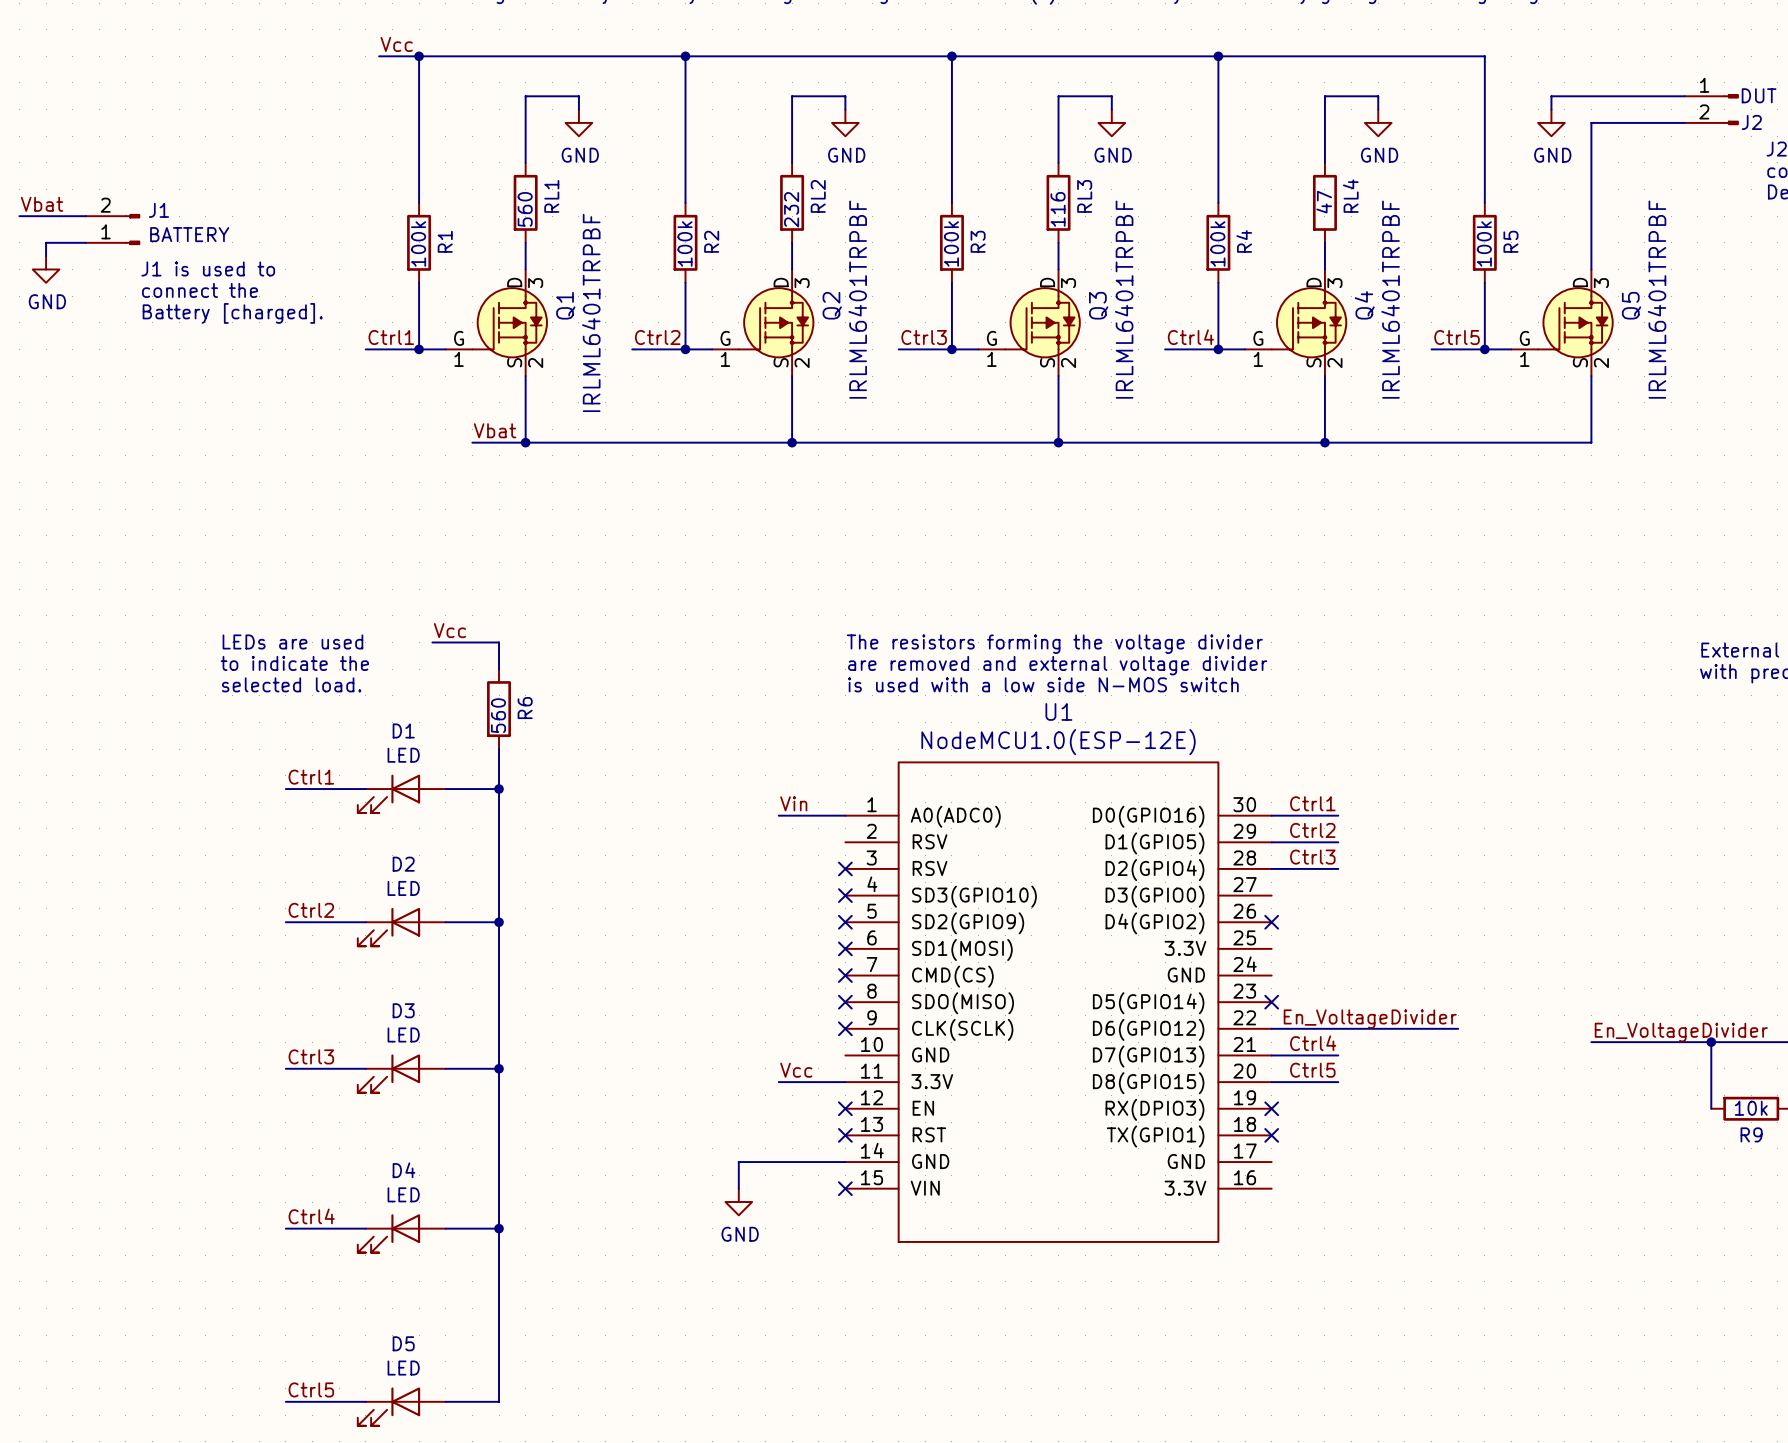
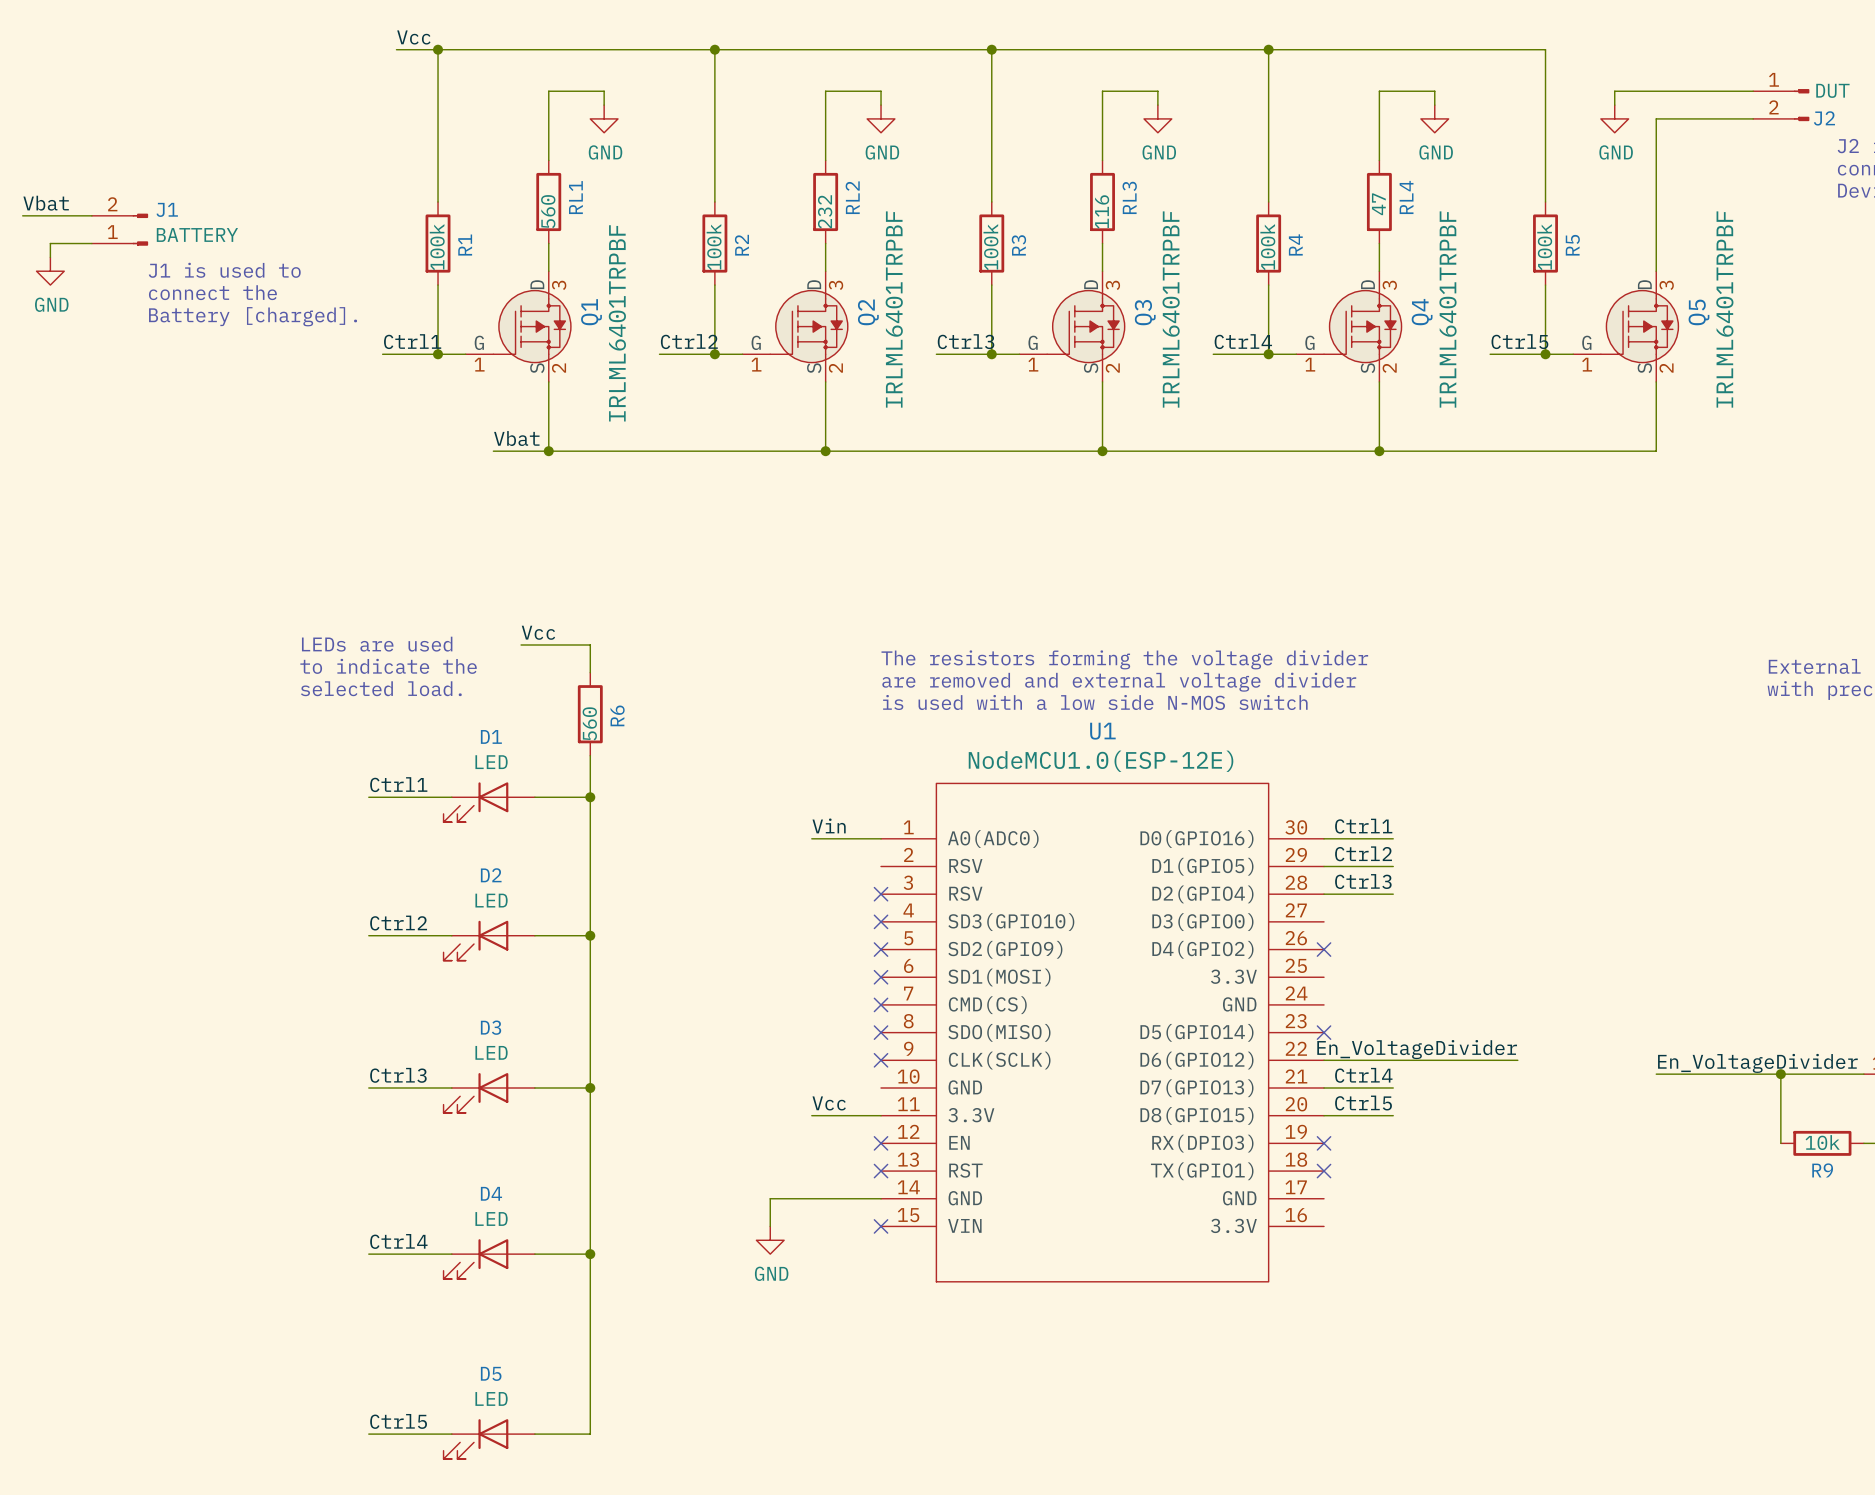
label position: Vcc (449, 630) -> Vcc (538, 632)
text position: LEDs are used (292, 641) -> LEDs are used (377, 644)
wire: (432, 642) (499, 642) (499, 669) -> (521, 644) (590, 644) (590, 672)
text position: to indicate the (294, 663) -> to indicate the (388, 666)
text position: selected load. (291, 684) -> selected load. (381, 688)
R6 position: (499, 709) -> (590, 714)
wire: (499, 749) (499, 1401) (445, 1401) -> (590, 755) (590, 1434) (534, 1434)
junction: none -> (590, 797)
label position: Ctrl1 (311, 777) -> Ctrl1 (398, 784)
wire: (285, 789) (365, 789) -> (368, 797) (451, 797)
wire: (445, 789) (499, 789) -> (534, 797) (590, 797)
junction: (499, 789) -> none
D1 position: (401, 793) -> (489, 802)
junction: none -> (590, 935)
label position: Ctrl2 (311, 910) -> Ctrl2 (398, 923)
wire: (285, 922) (365, 922) -> (368, 935) (451, 935)
wire: (445, 922) (499, 922) -> (534, 935) (590, 935)
junction: (499, 922) -> none
D2 position: (401, 927) -> (489, 940)
junction: none -> (590, 1087)
label position: Ctrl3 (311, 1056) -> Ctrl3 (398, 1075)
wire: (285, 1068) (365, 1068) -> (368, 1087) (451, 1087)
wire: (445, 1068) (499, 1068) -> (534, 1087) (590, 1087)
junction: (499, 1068) -> none
D3 position: (401, 1073) -> (489, 1092)
junction: none -> (590, 1254)
label position: Ctrl4 (311, 1216) -> Ctrl4 (398, 1241)
wire: (285, 1228) (365, 1228) -> (368, 1254) (451, 1254)
wire: (445, 1228) (499, 1228) -> (534, 1254) (590, 1254)
junction: (499, 1228) -> none
D4 position: (401, 1233) -> (489, 1259)
label position: Ctrl5 (311, 1389) -> Ctrl5 (398, 1421)
wire: (285, 1401) (365, 1401) -> (368, 1434) (451, 1434)
D5 position: (401, 1406) -> (489, 1439)

